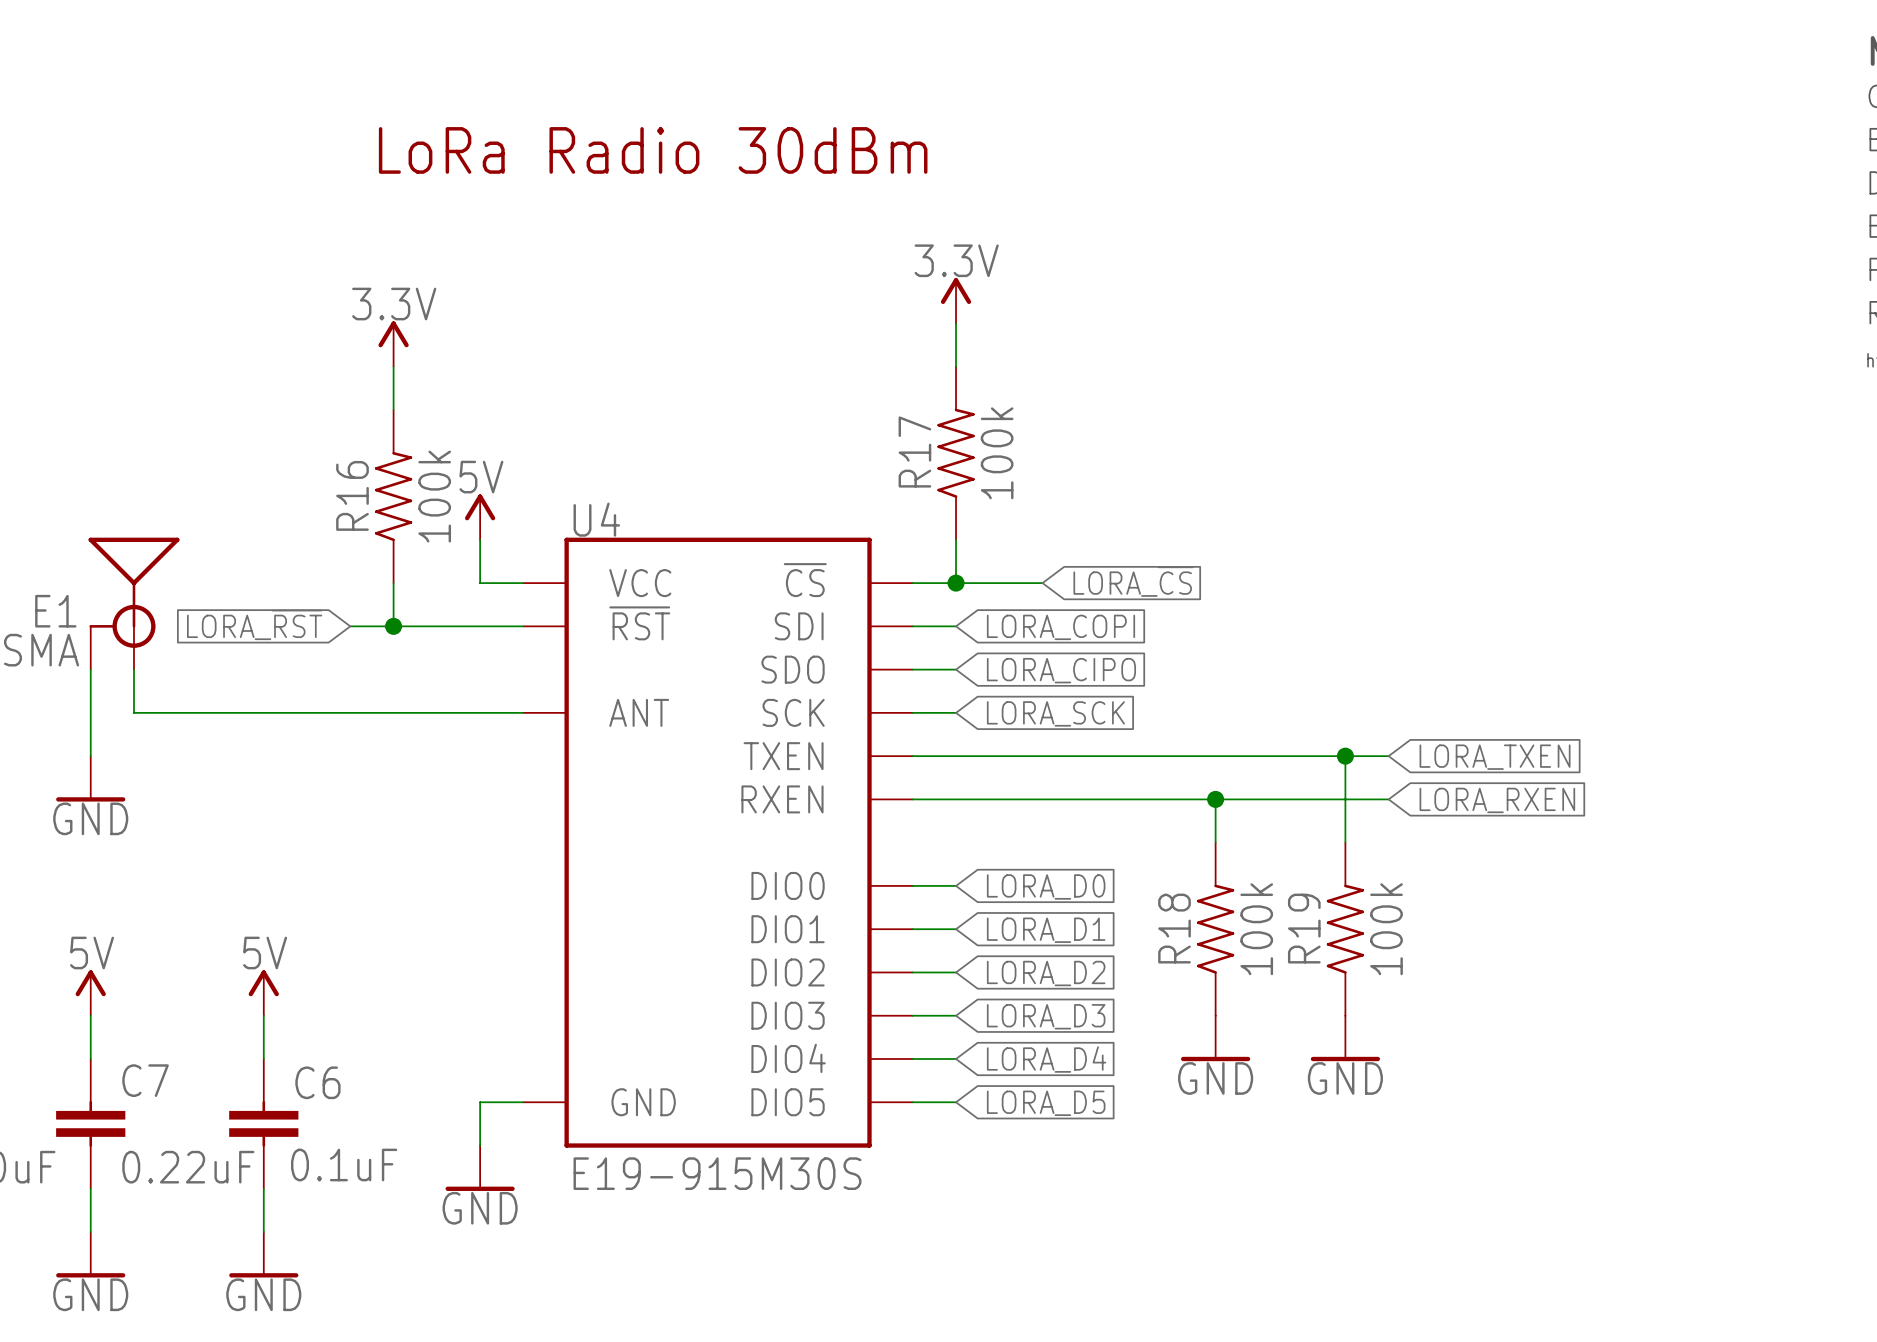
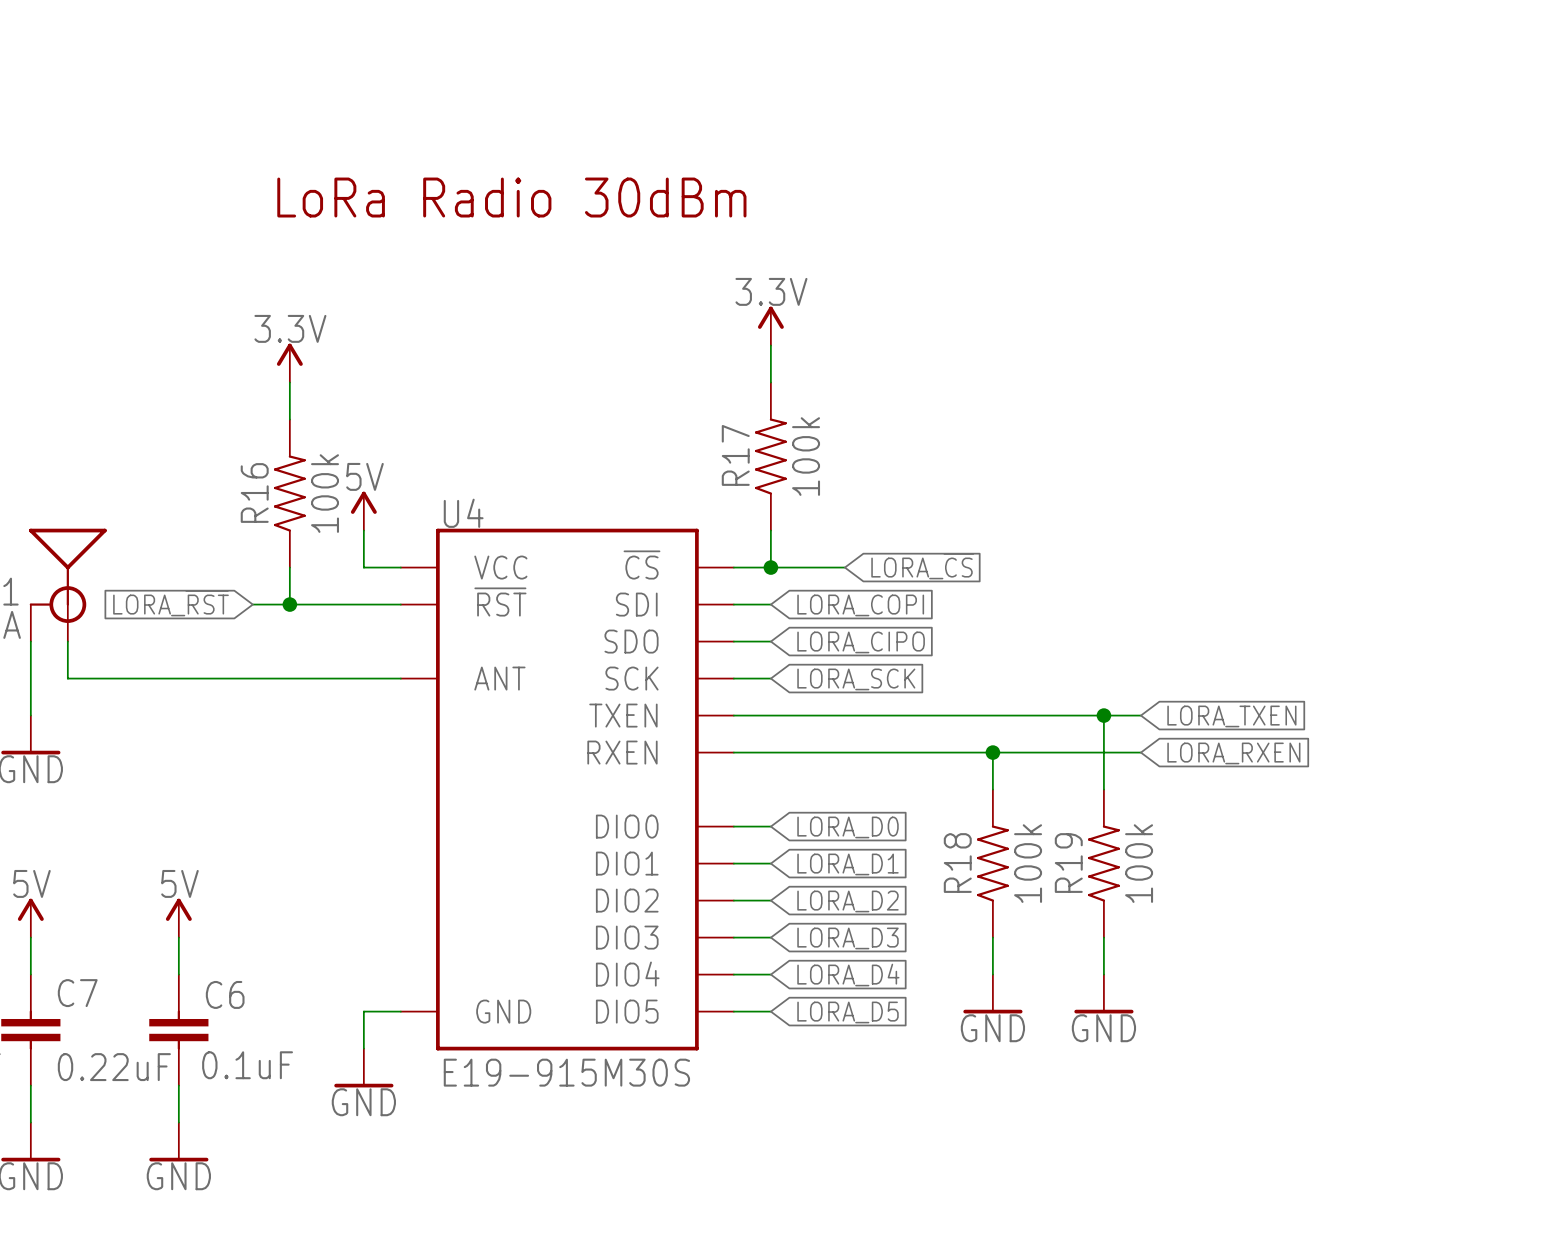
power symbol position: GND (1215, 1038) -> GND (992, 994)
power symbol position: GND (1345, 1038) -> GND (1103, 994)

